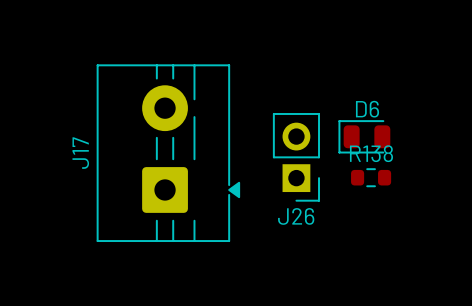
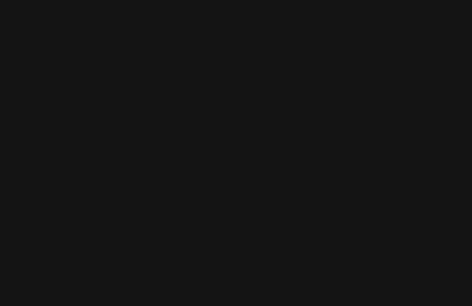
D6: (364, 136) -> none
J17: (168, 153) -> none
J26: (296, 157) -> none
R138: (371, 177) -> none

